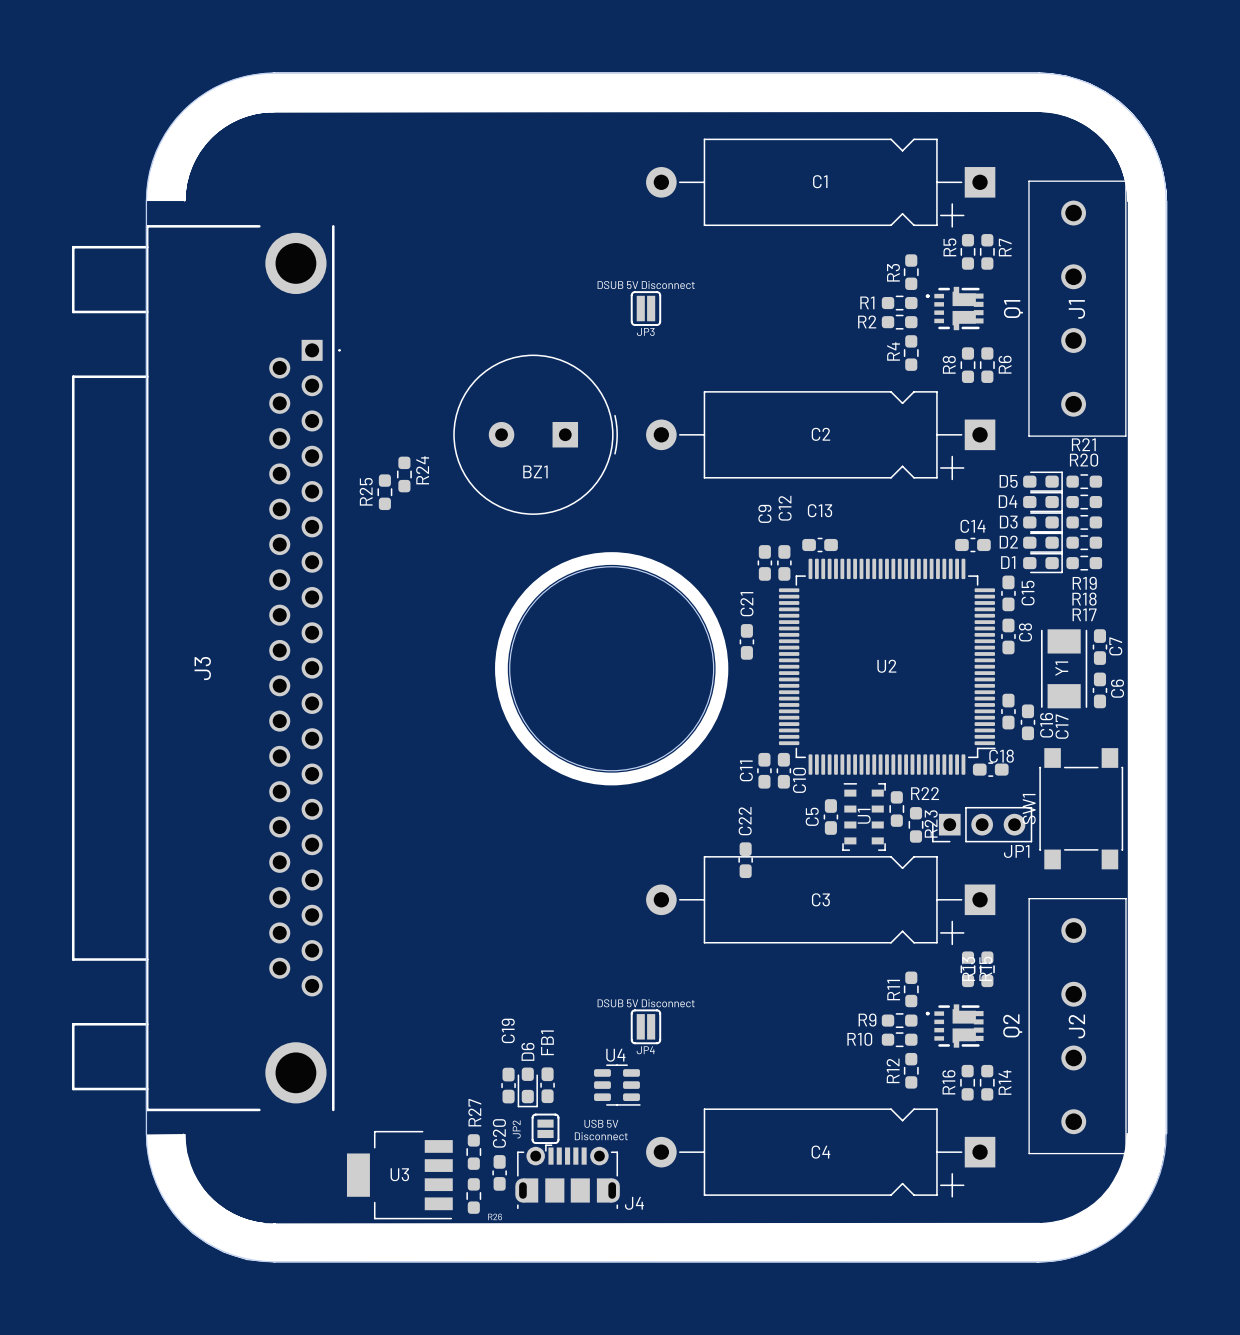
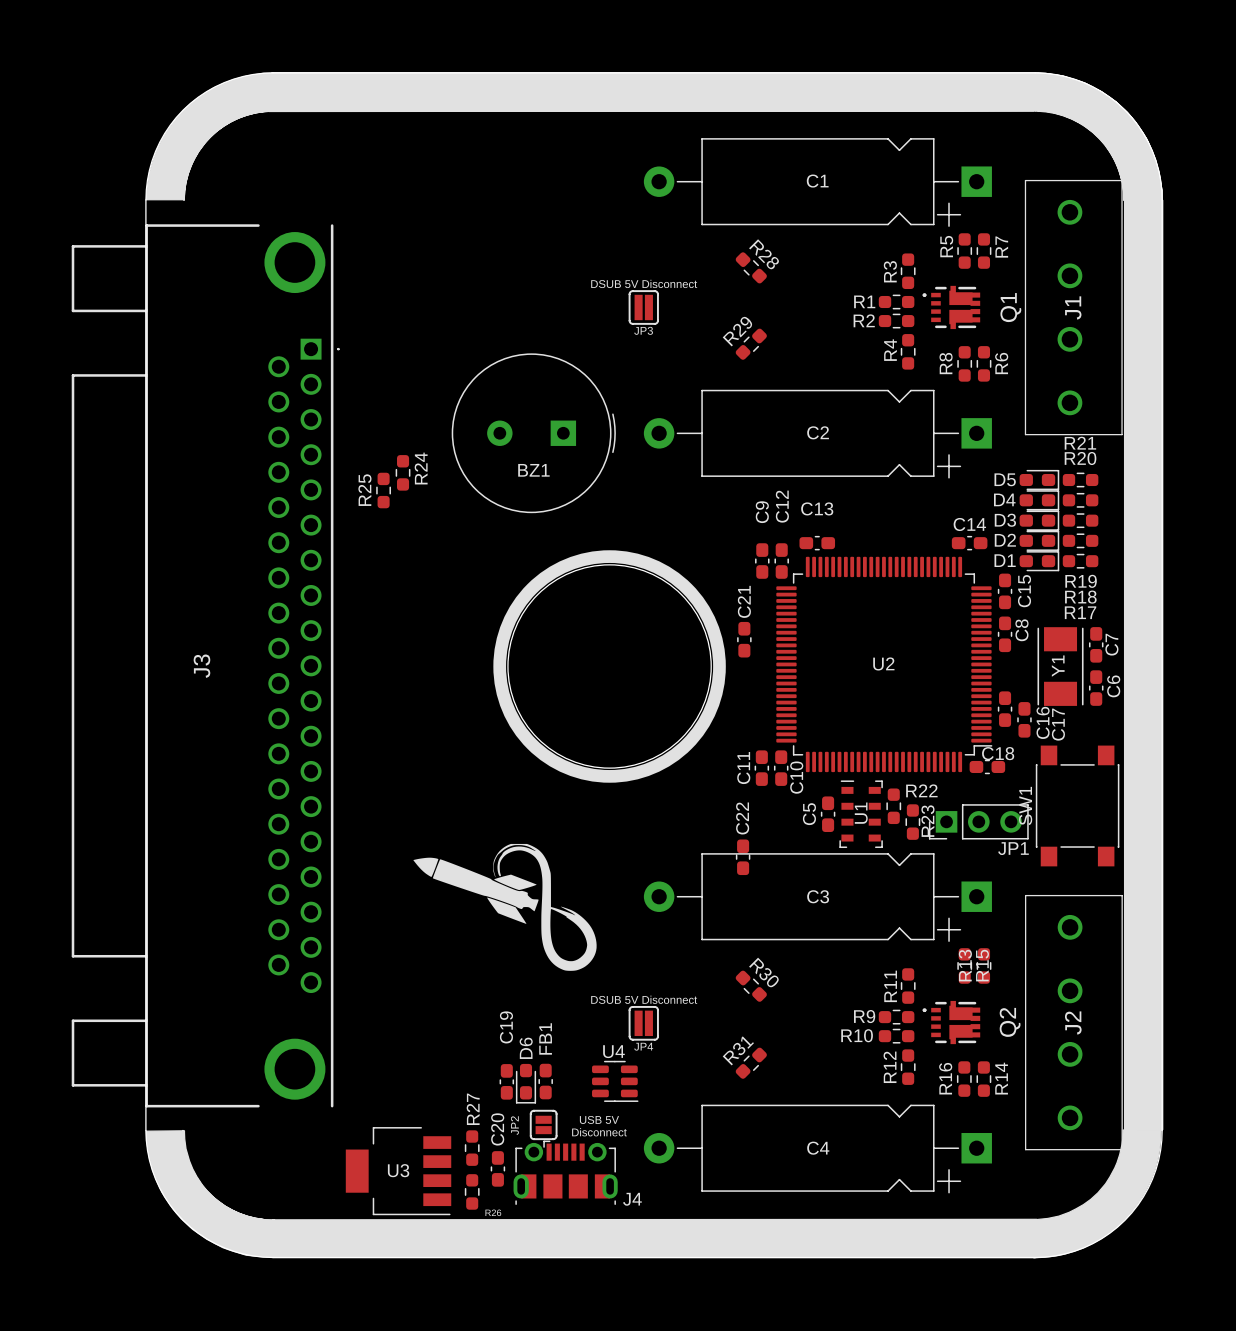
R28: none -> (751, 267)
R29: none -> (751, 344)
drawing: none -> [413, 843, 597, 971]
R30: none -> (751, 986)
R31: none -> (751, 1063)

